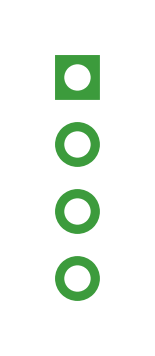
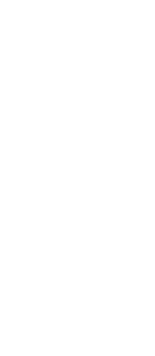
part: (77, 177) -> none

